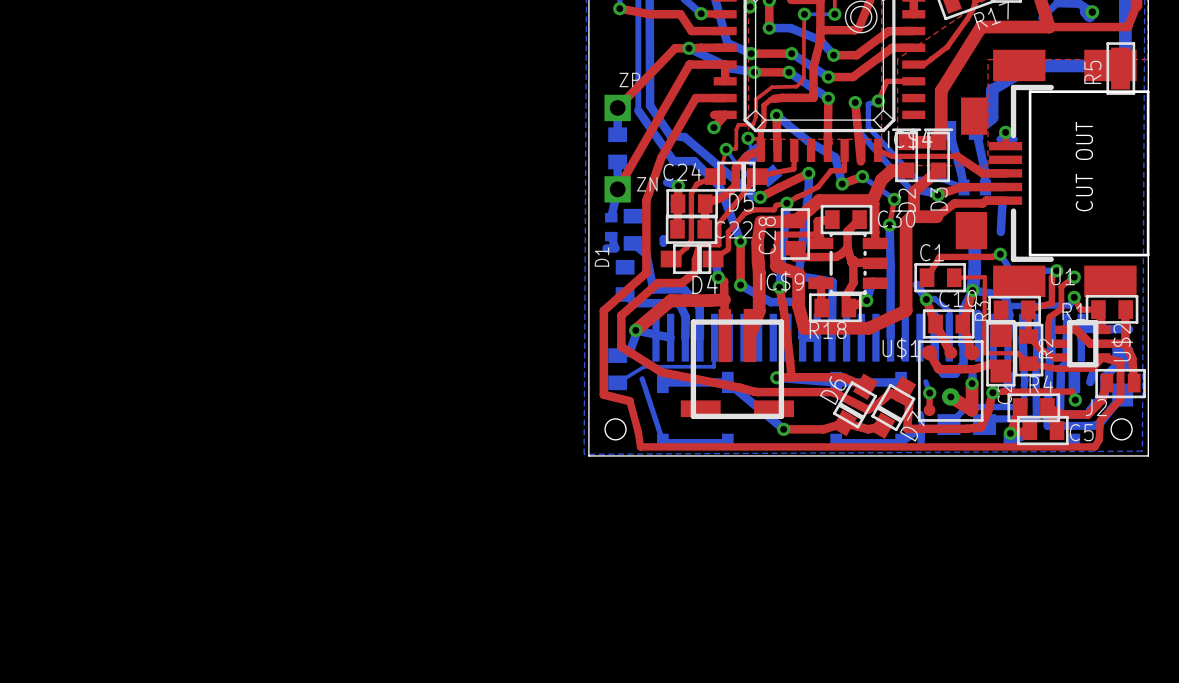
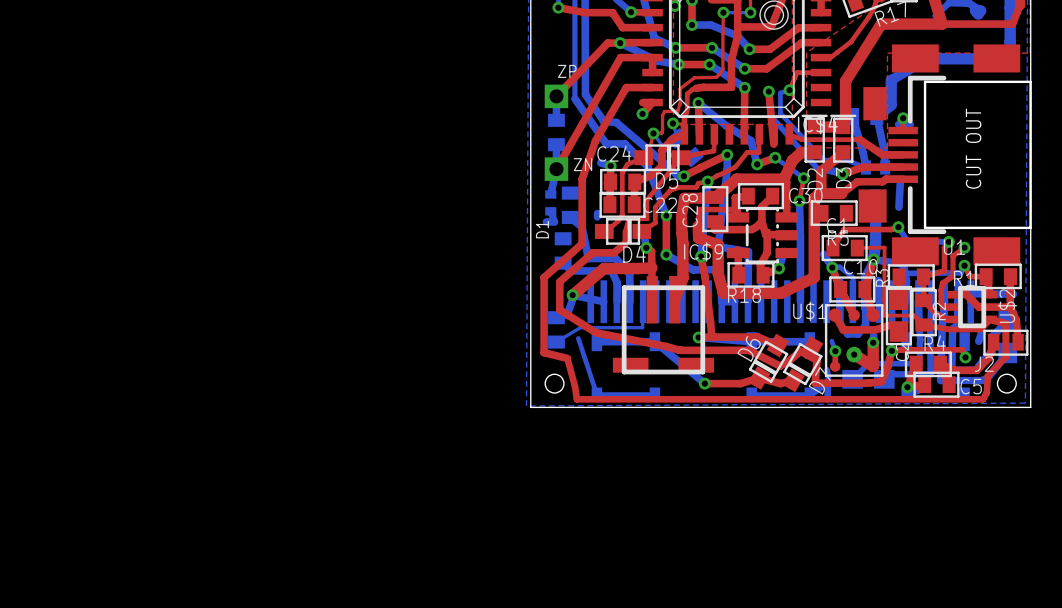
via: (1092, 12) -> none
R5 rotation: 0° (1120, 68) -> 90° clockwise (834, 213)
R5 position: (1120, 68) -> (834, 213)

